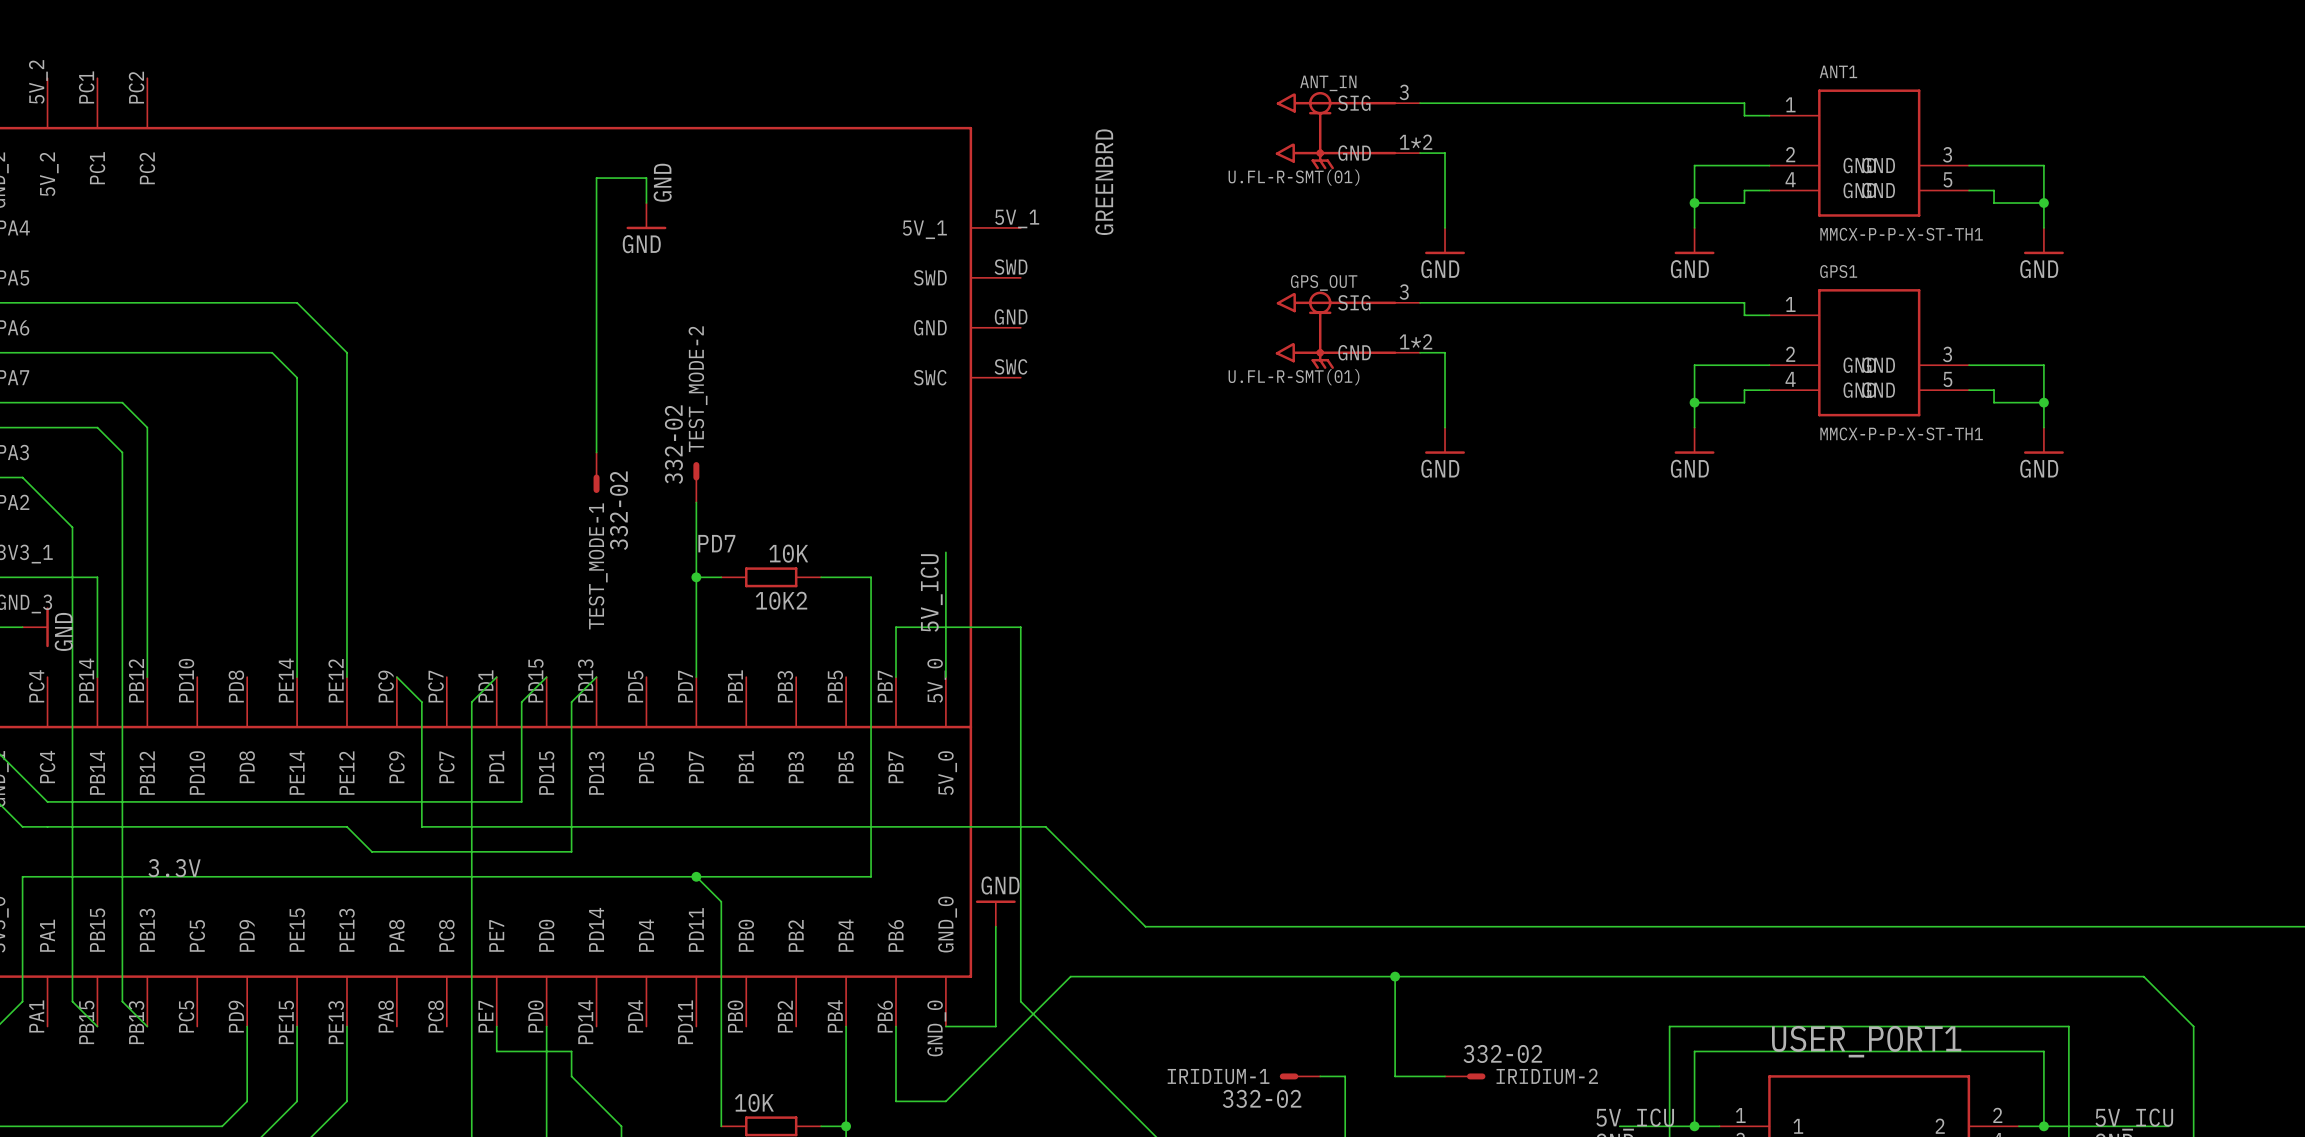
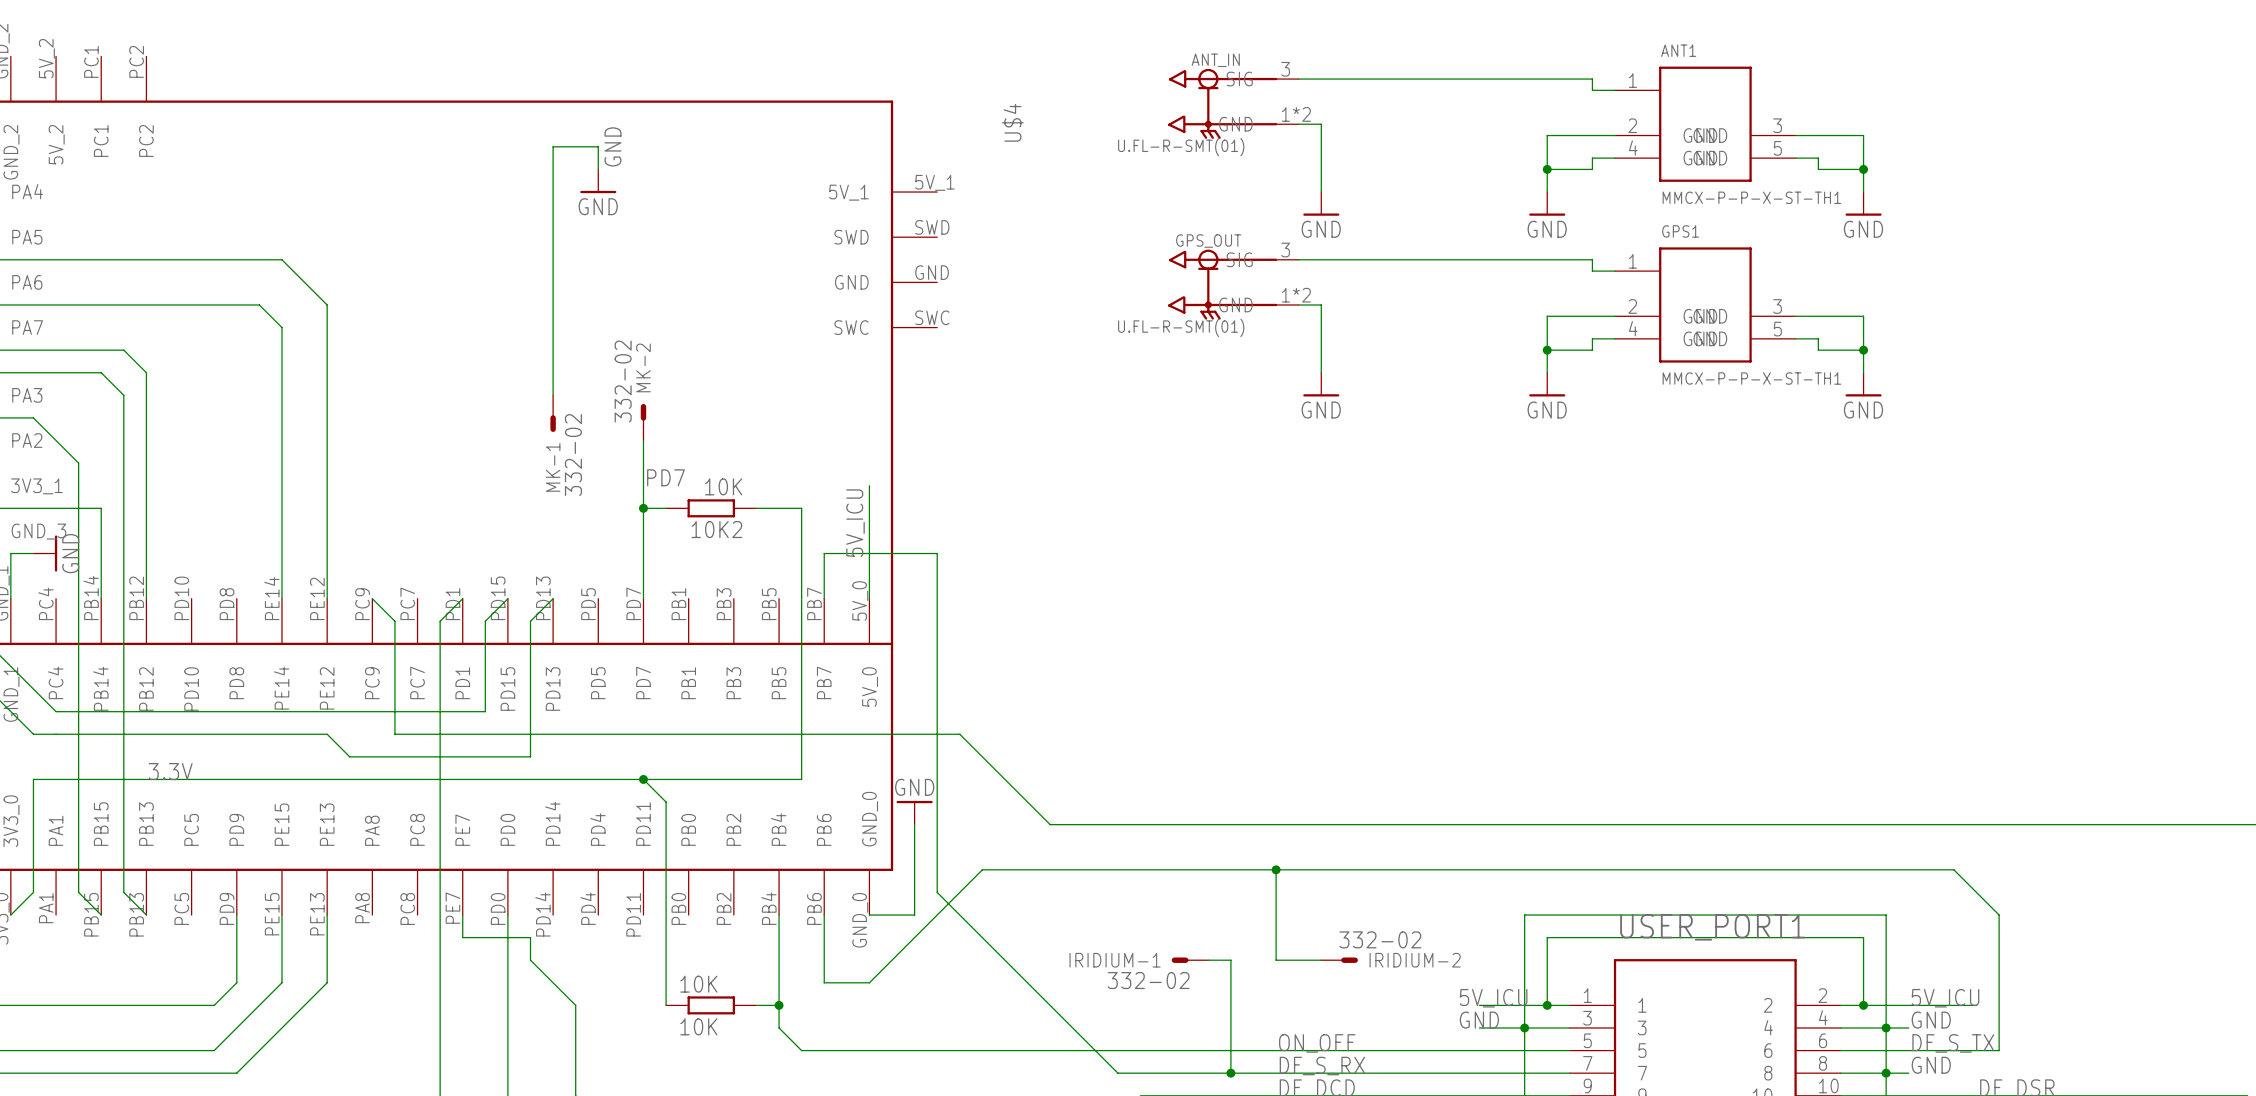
GREENBRD name: GREENBRD (1104, 182) -> U$4 (1012, 122)
TEST_MODE-2 name: TEST_MODE-2 (698, 389) -> MK-2 (643, 367)
TEST_MODE-1 name: TEST_MODE-1 (598, 566) -> MK-1 (553, 467)

